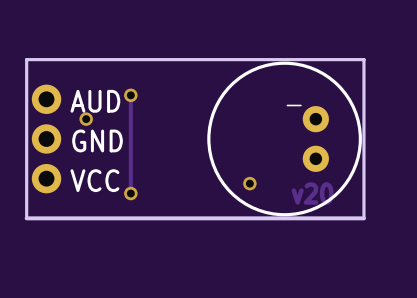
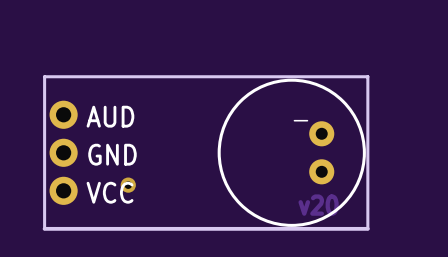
track: (130, 95) (130, 193) -> none
via: (130, 95) -> none
via: (86, 119) -> none
via: none -> (128, 185)
via: (249, 183) -> none
via: (130, 193) -> none

